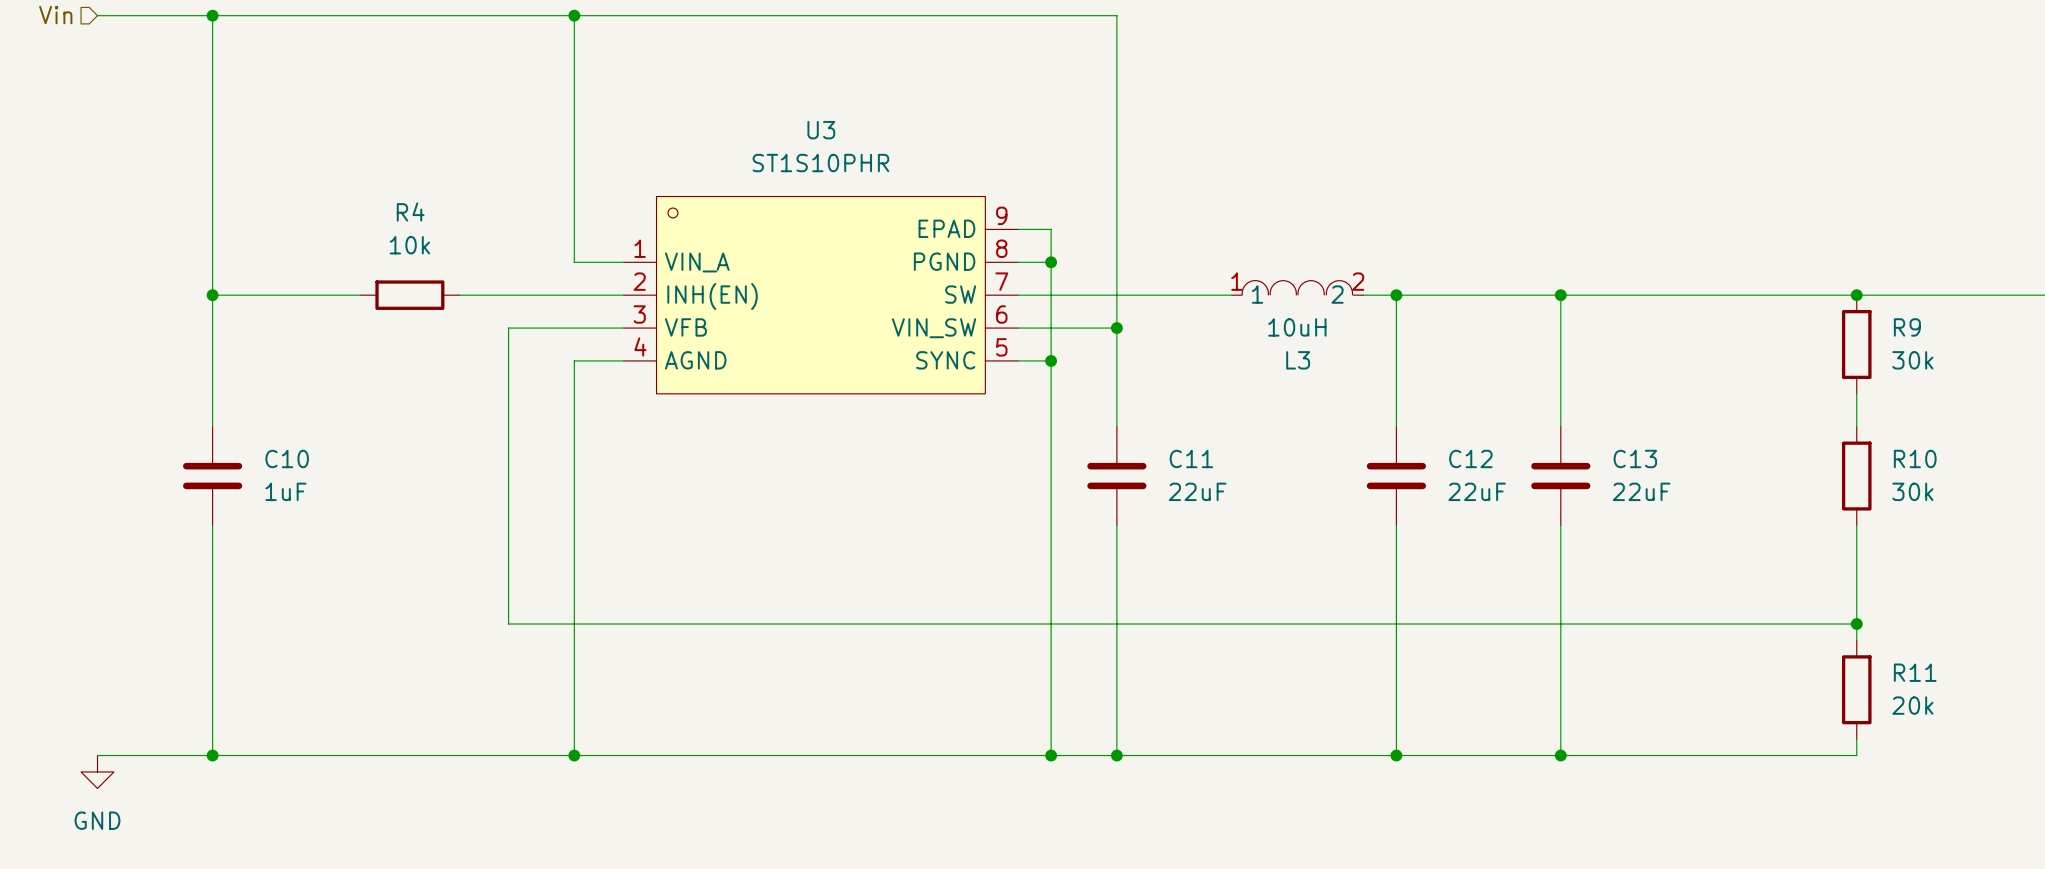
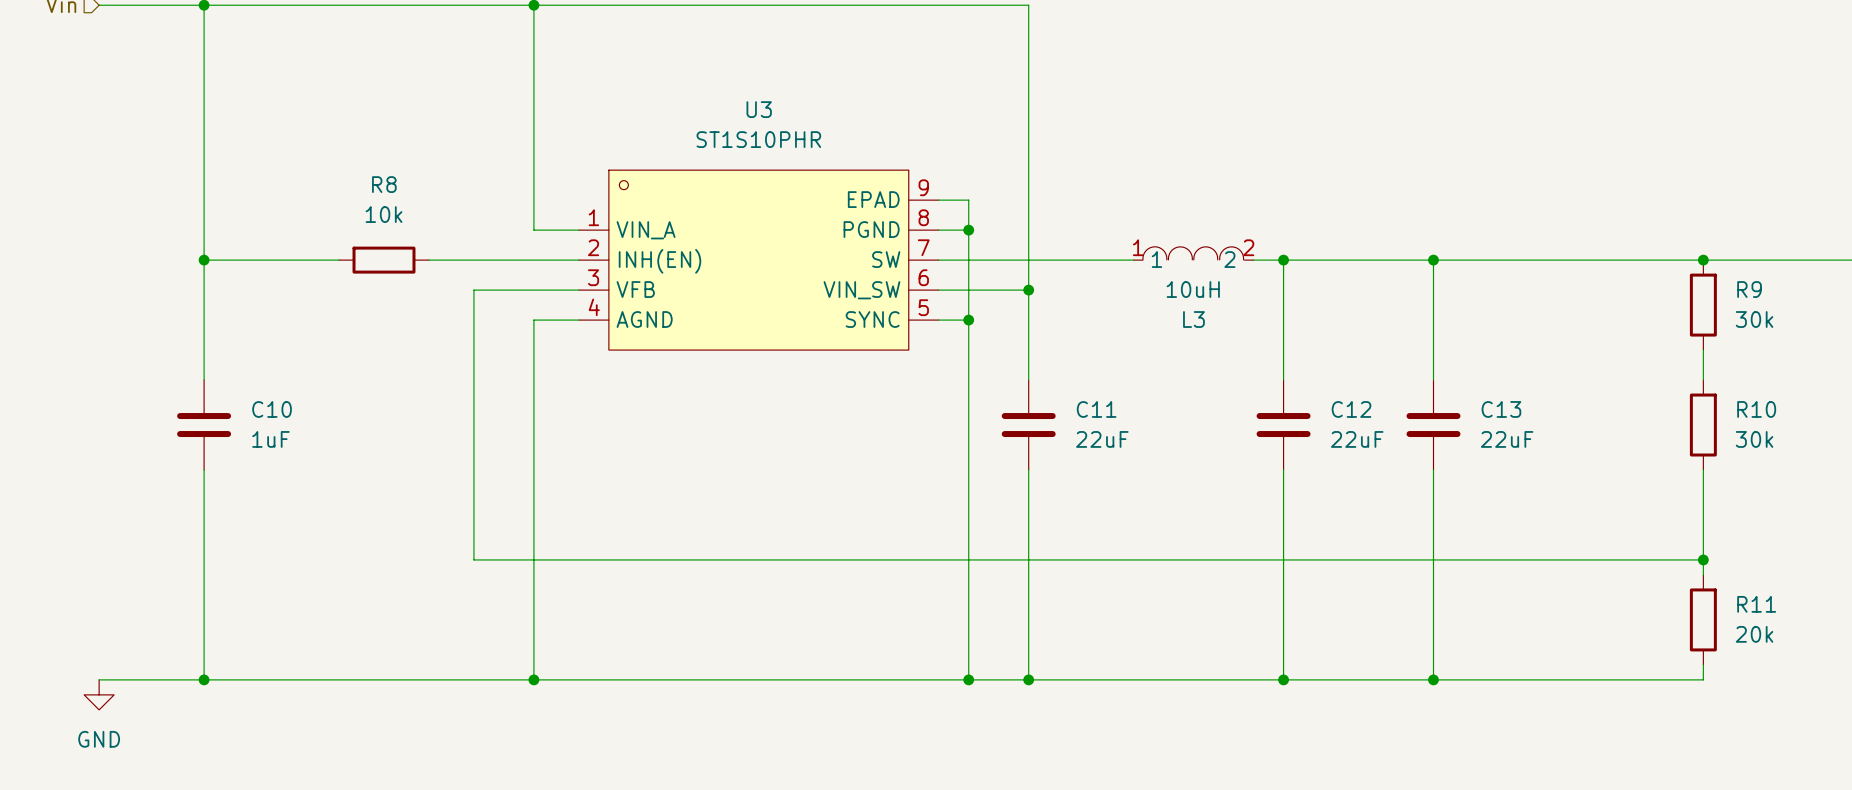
R4 name: R4 (410, 211) -> R8 (384, 184)

